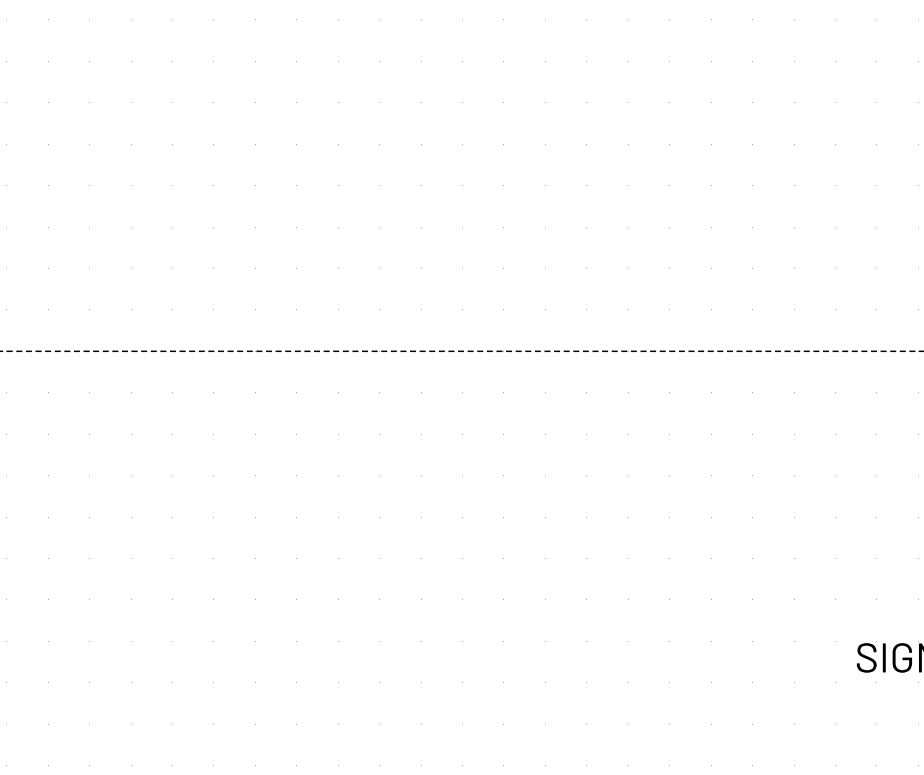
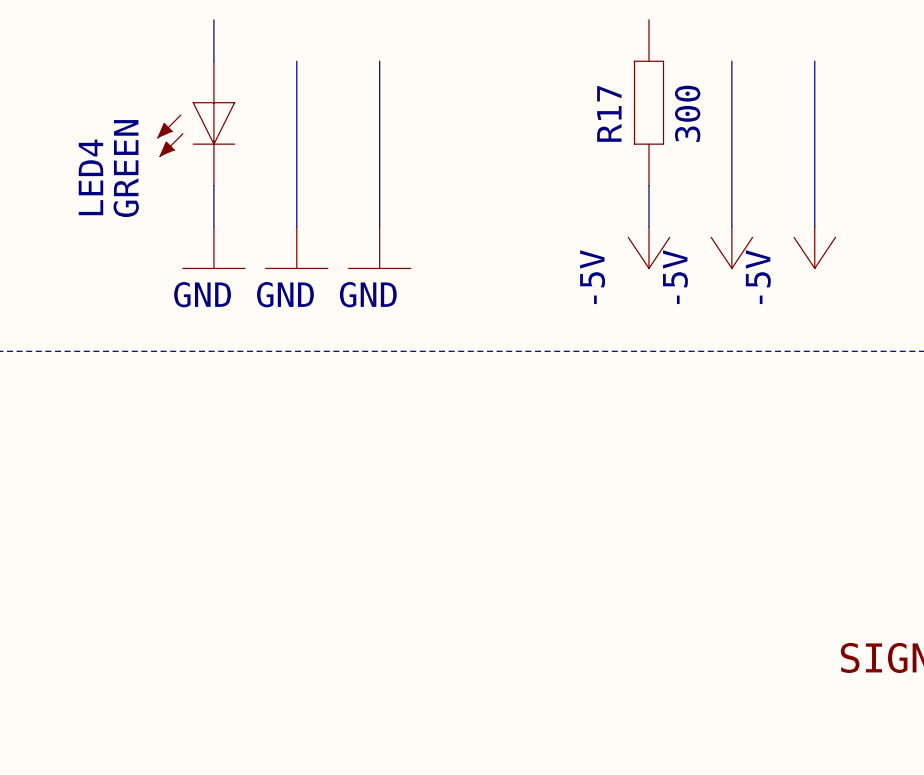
wire: none -> (213, 19) (213, 61)
wire: none -> (296, 61) (296, 227)
wire: none -> (379, 61) (379, 227)
wire: none -> (731, 61) (731, 227)
wire: none -> (814, 61) (814, 227)
R17: none -> 300 (649, 102)
LED4: none -> GREEN (196, 123)
wire: none -> (213, 185) (213, 227)
wire: none -> (649, 185) (649, 227)
power symbol: none -> GND (213, 247)
power symbol: none -> GND (296, 247)
power symbol: none -> GND (379, 247)
power symbol: none -> -5V (649, 247)
power symbol: none -> -5V (731, 247)
power symbol: none -> -5V (814, 247)

